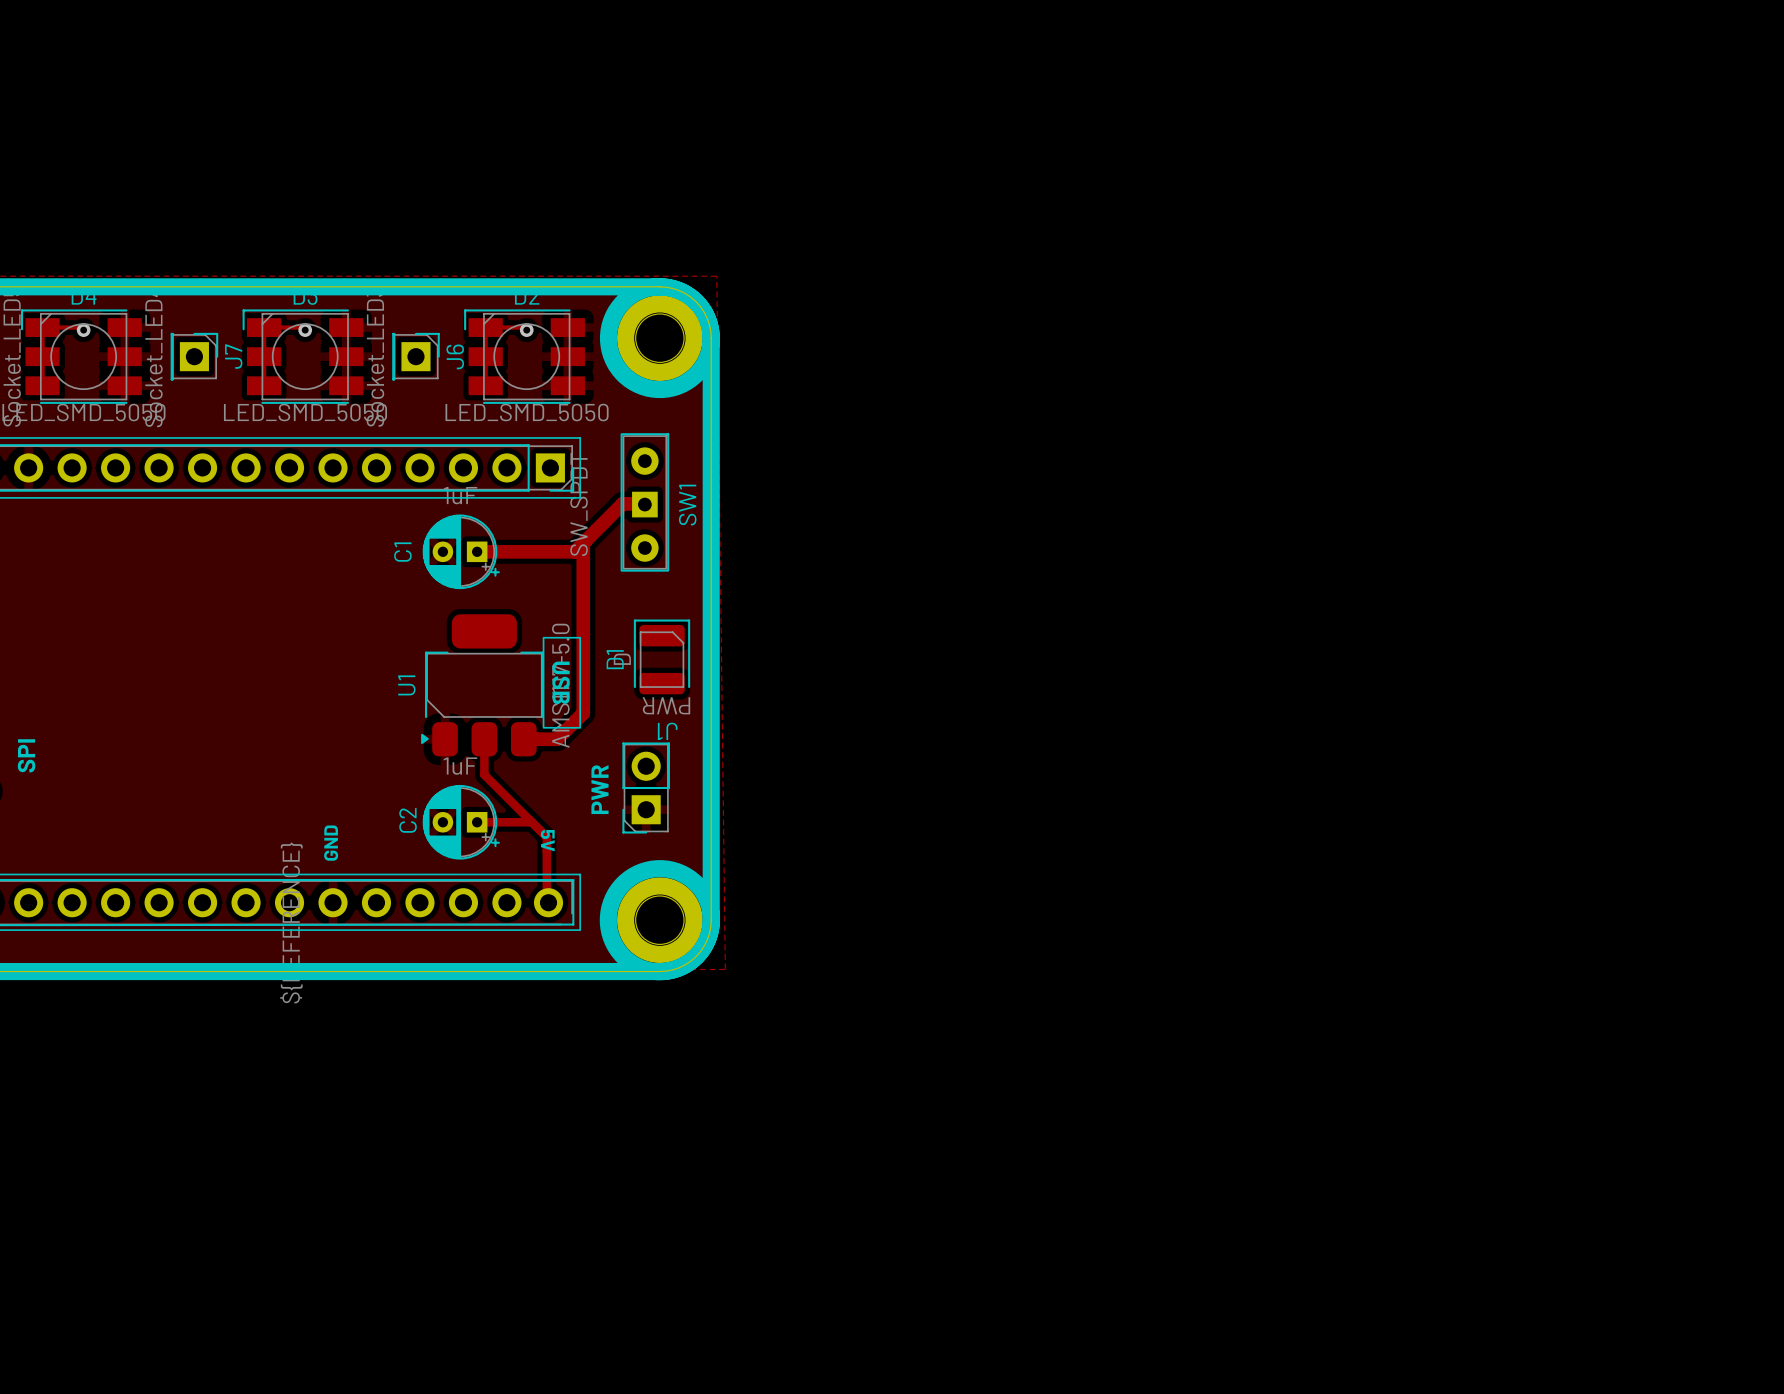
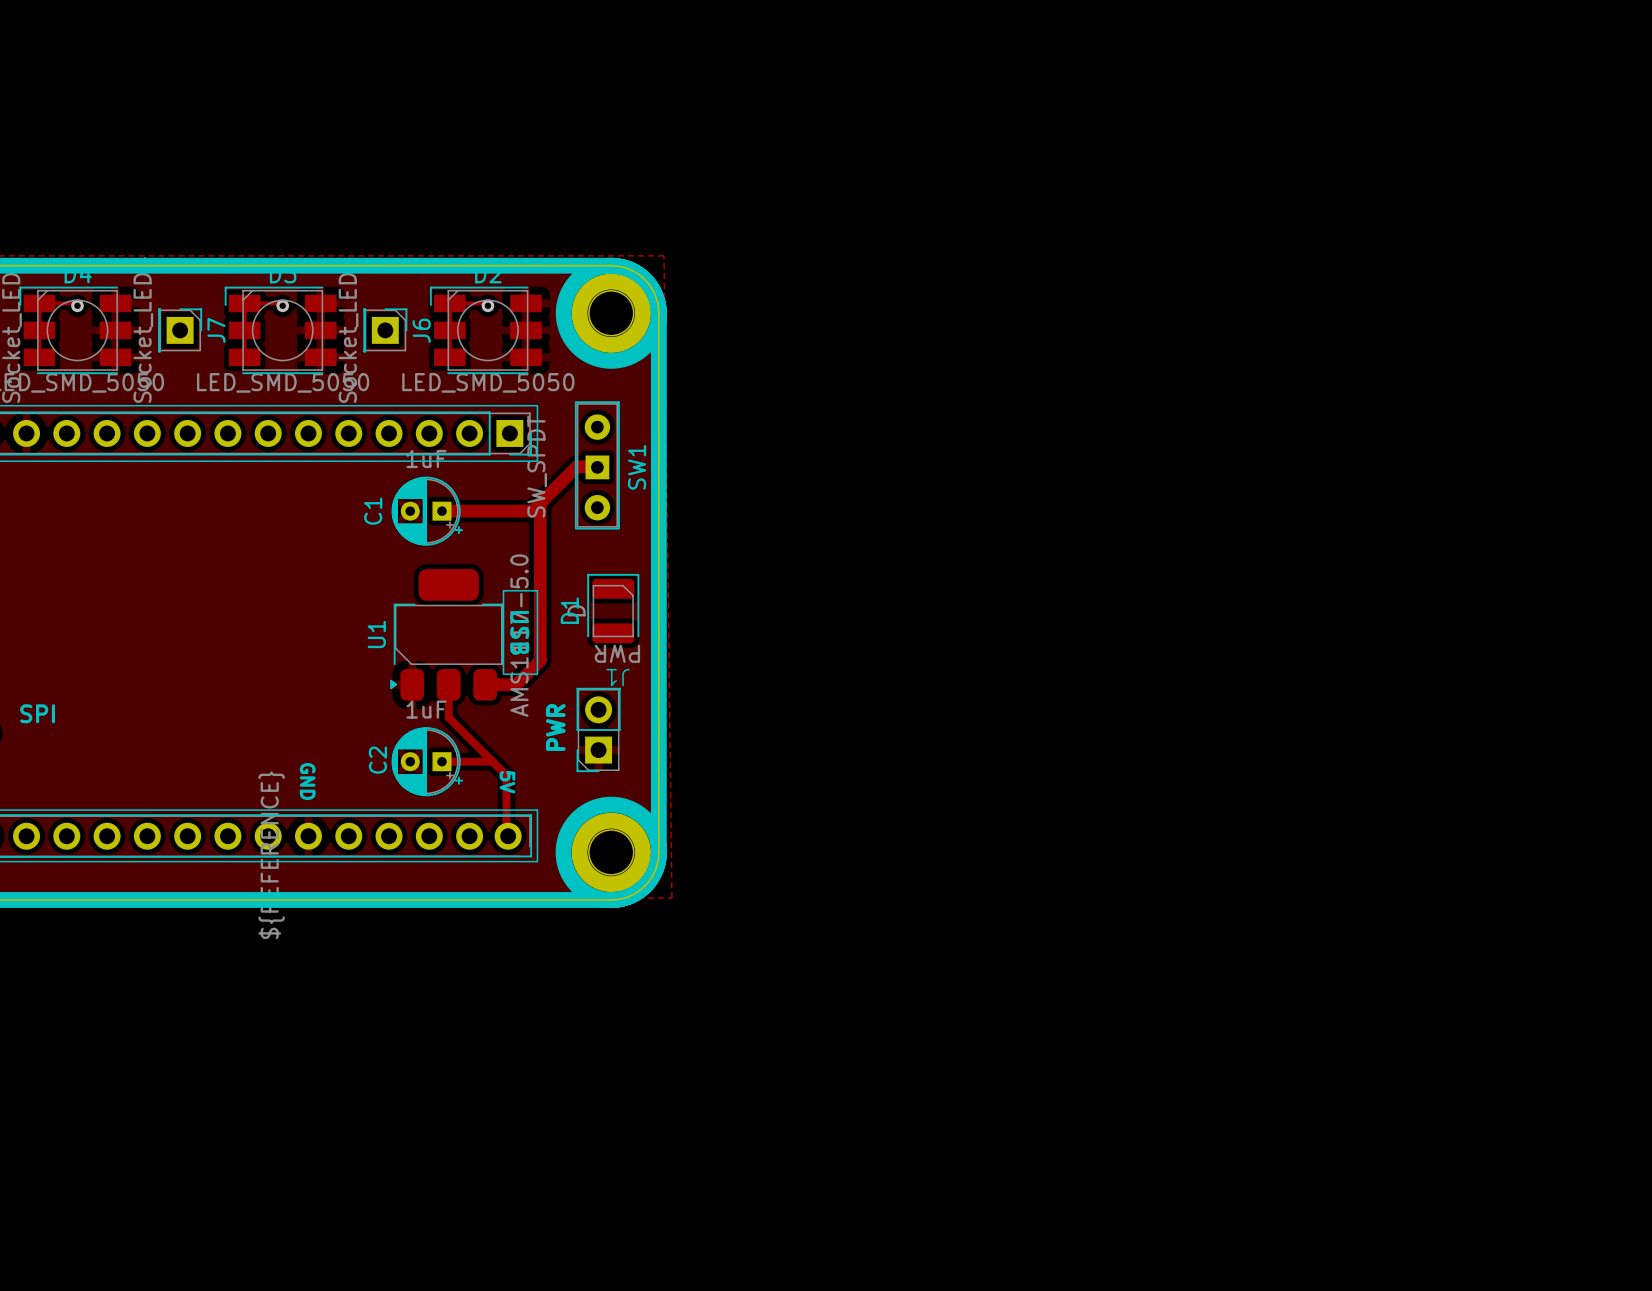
part text rotation: 0° (26, 755) -> 90° clockwise (37, 713)
part text rotation: 0° (331, 843) -> 180° (307, 781)

